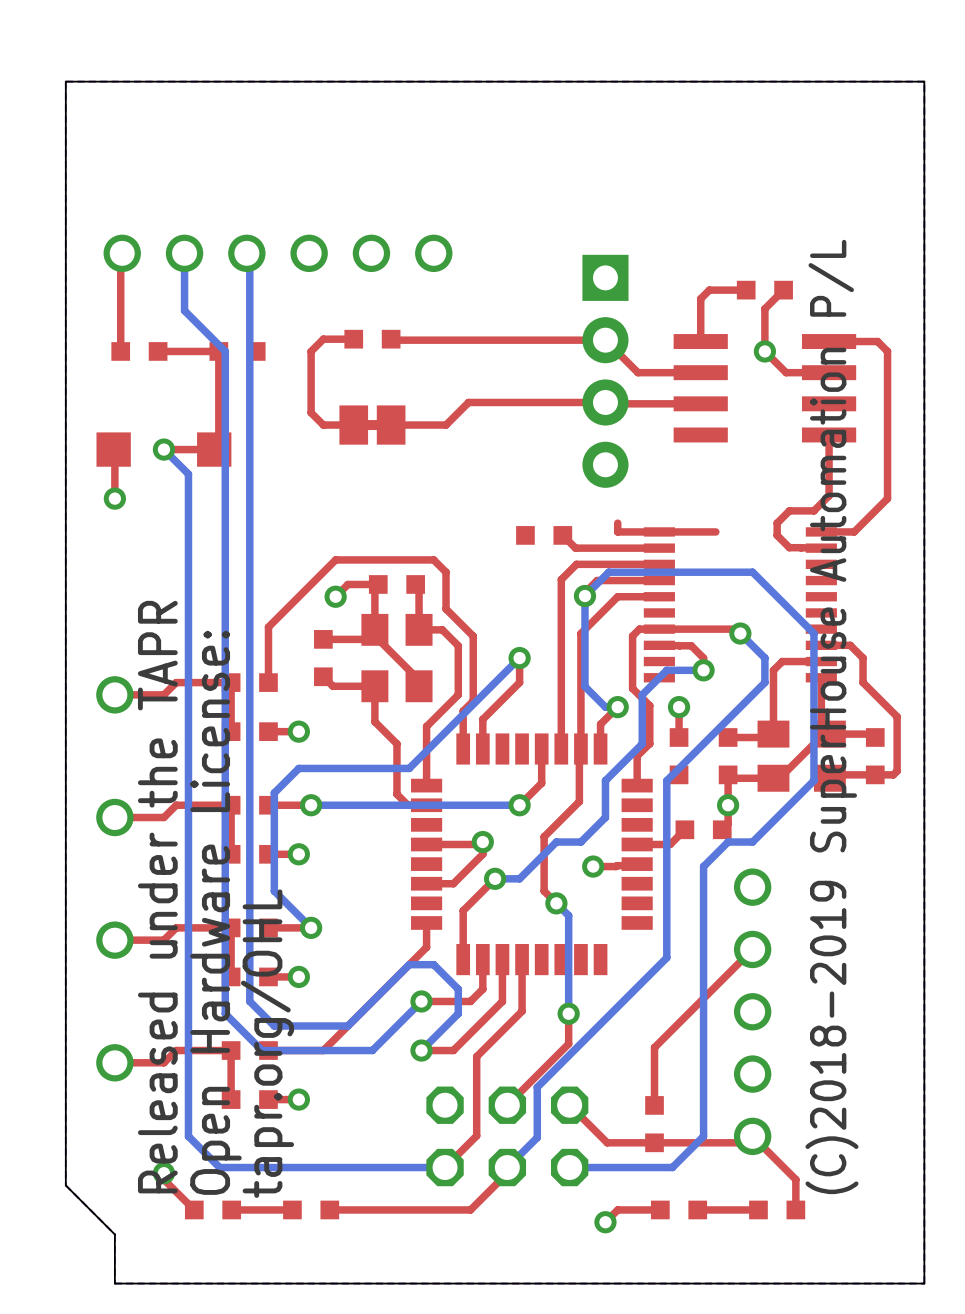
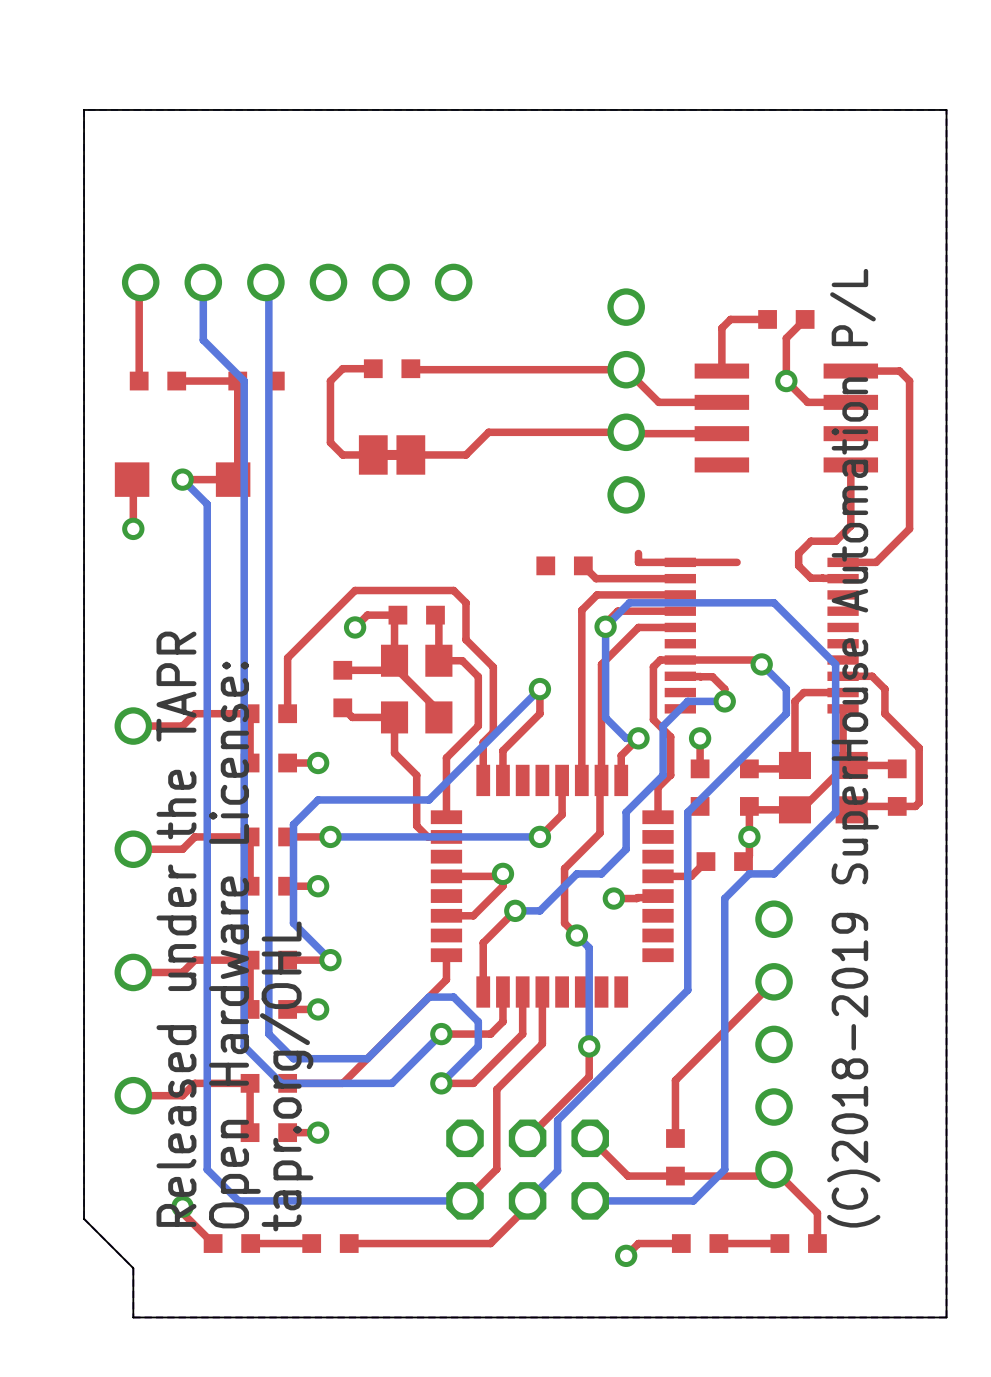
part footprint: [582, 254, 629, 488] -> [607, 288, 645, 514]

